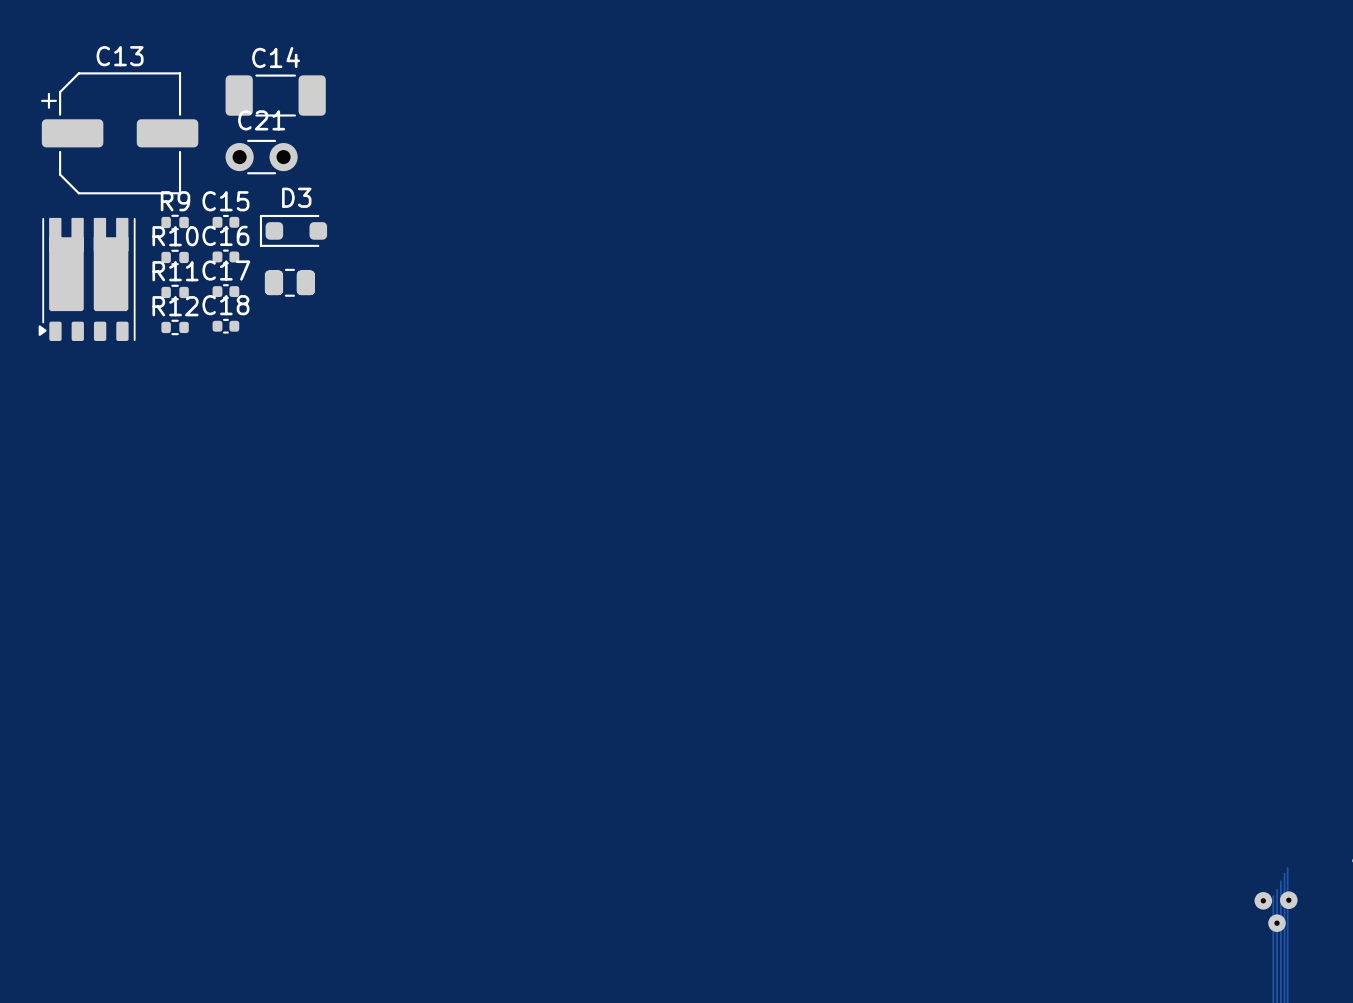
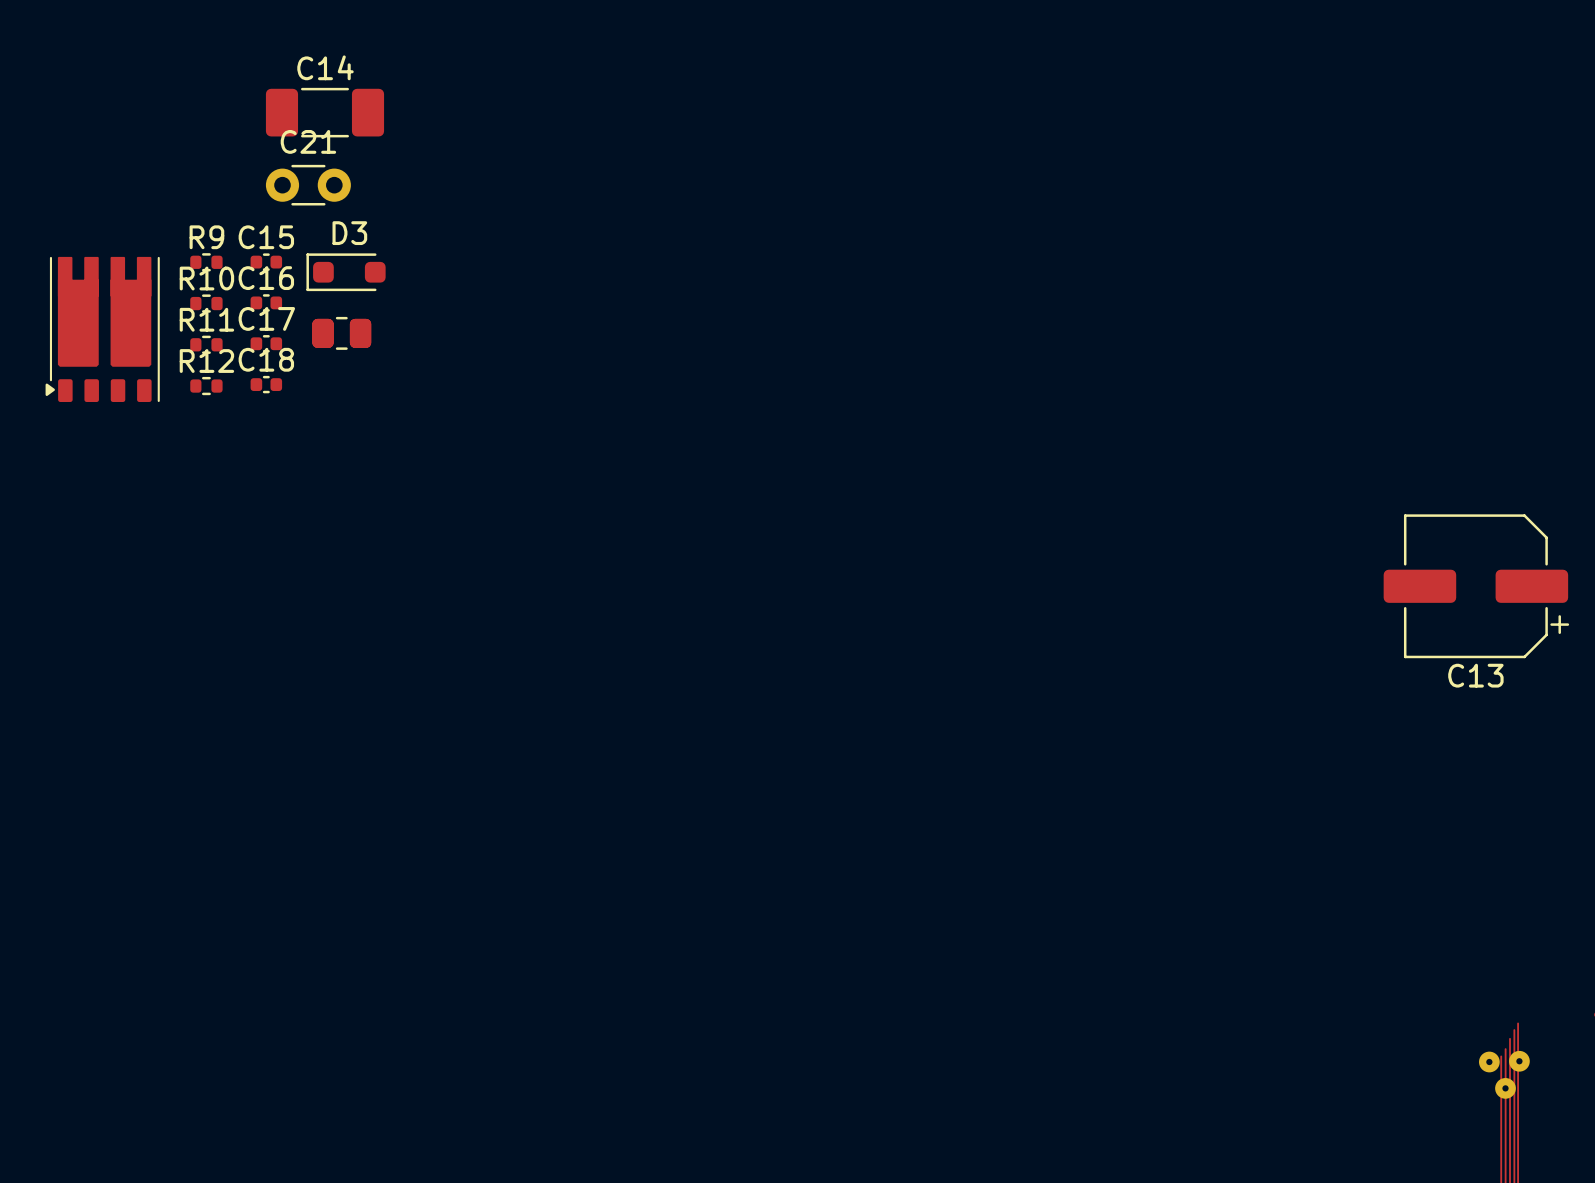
C13 name position: C13 (120, 56) -> C13 (1475, 675)
C13 footprint: [40, 72, 199, 195] -> [1383, 514, 1570, 659]

